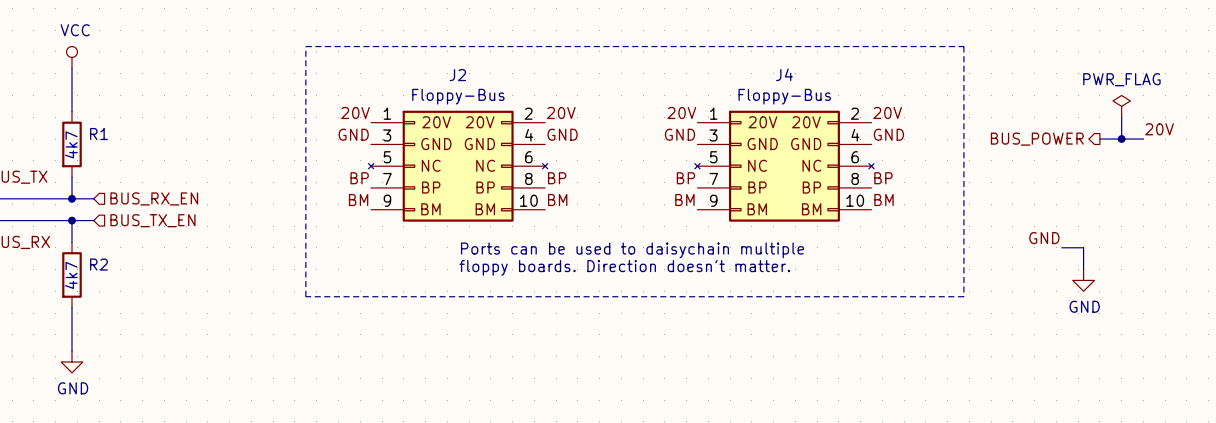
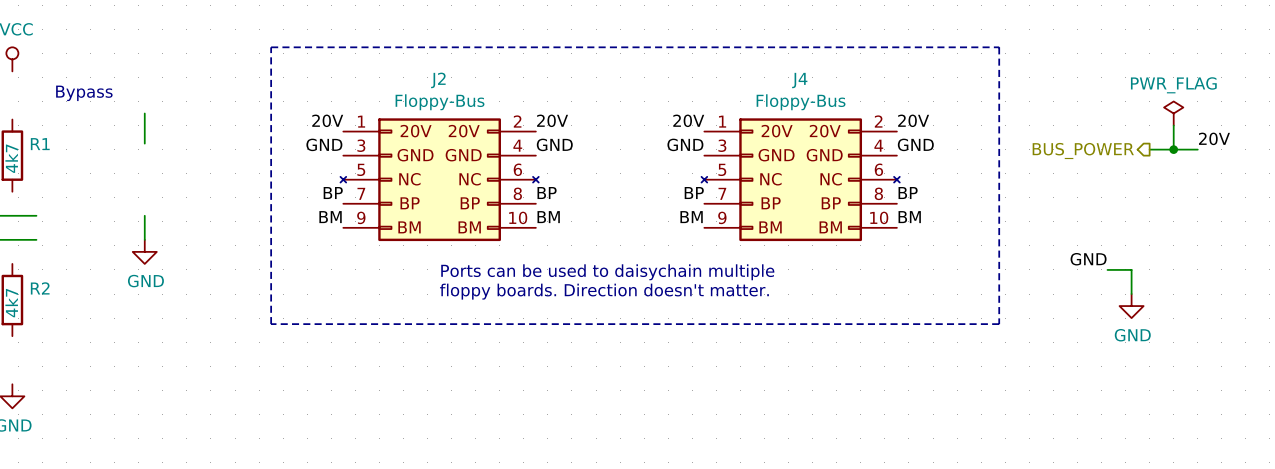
wire: (71, 68) (71, 111) -> none
text: none -> Bypass (84, 93)
wire: none -> (144, 113) (144, 143)
wire: (71, 177) (71, 198) -> (144, 215) (144, 239)
junction: (71, 198) -> none
hierarchical label: BUS_RX_EN (154, 198) -> none
wire: (71, 220) (71, 242) -> none
junction: (71, 220) -> none
hierarchical label: BUS_TX_EN (152, 220) -> none
power symbol: none -> GND (144, 251)
wire: (71, 307) (71, 351) -> none

